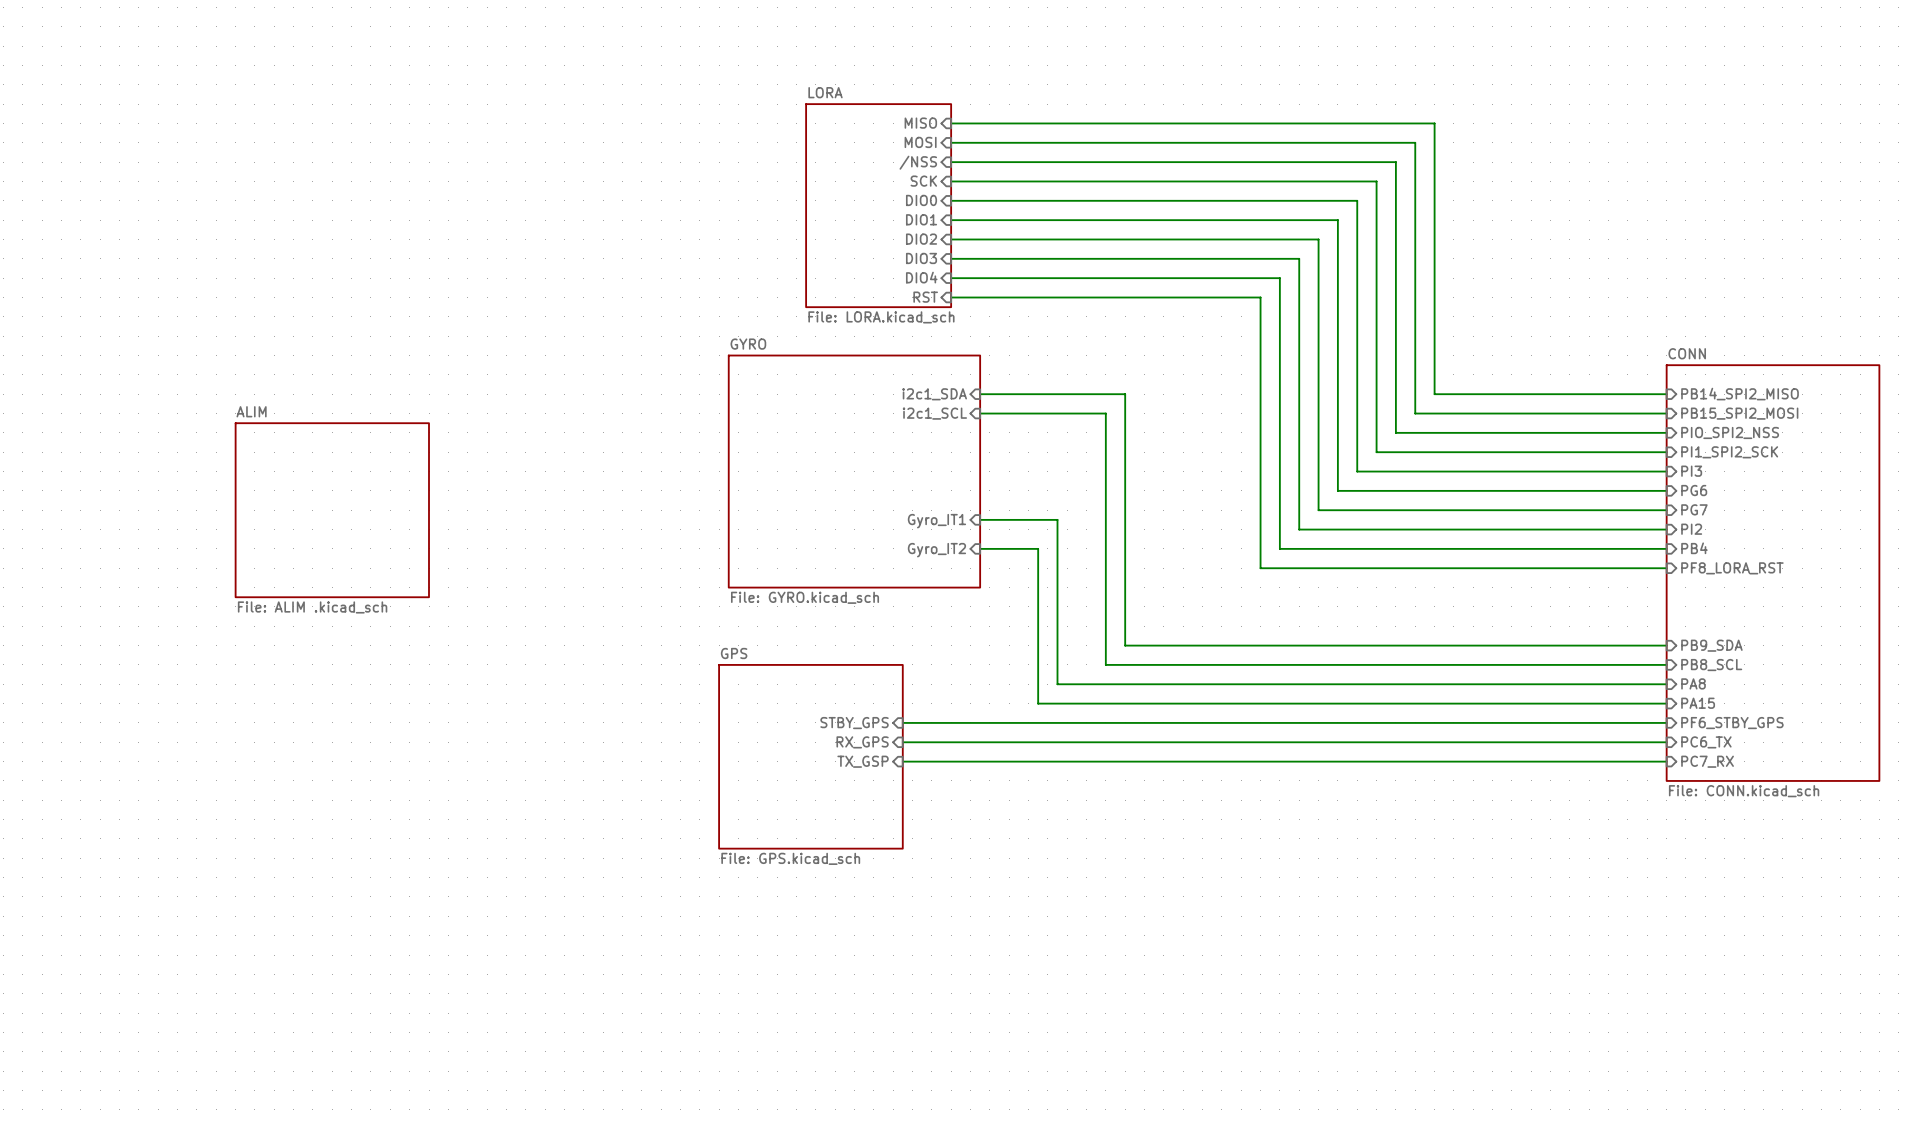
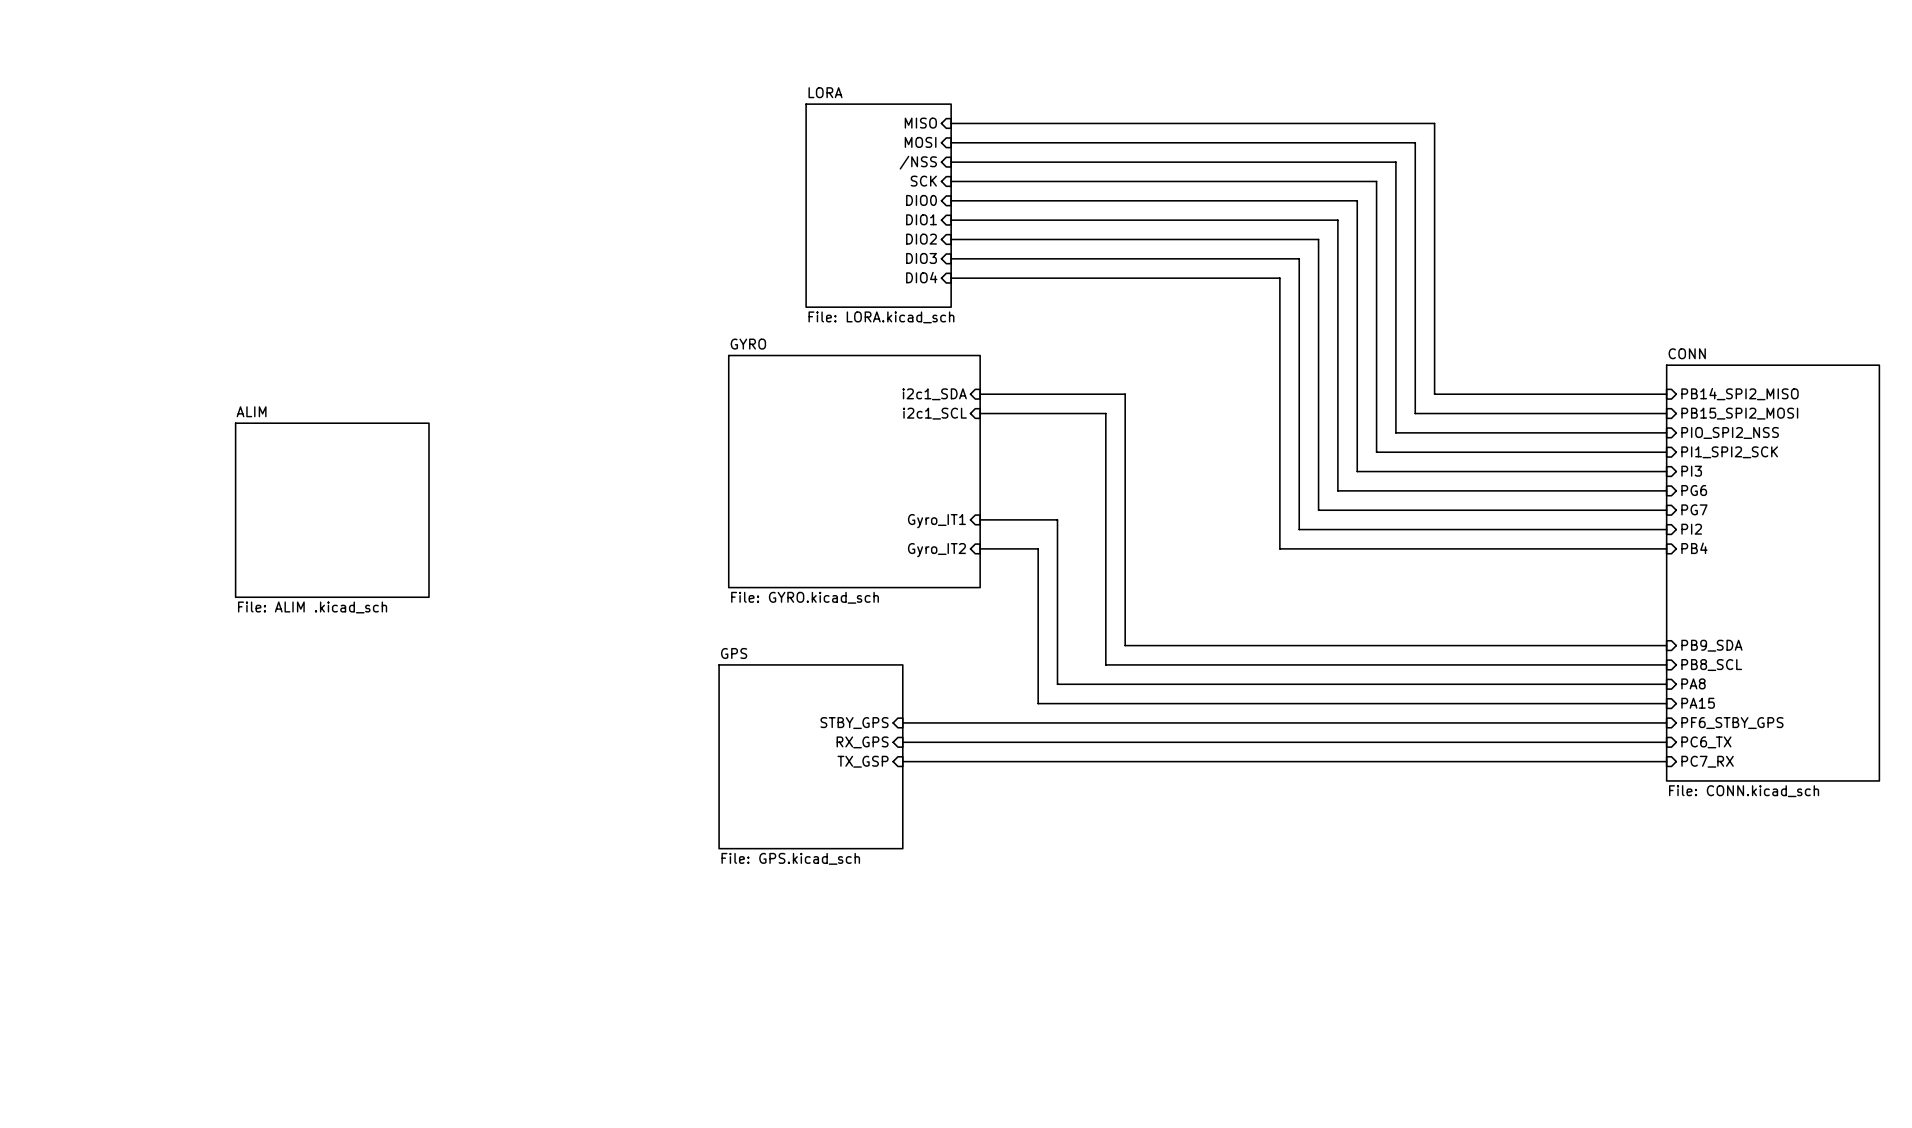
sheet pin: RST (925, 297) -> none
wire: (951, 297) (1260, 297) (1260, 568) (1666, 568) -> none
sheet pin: PF8_LORA_RST (1732, 568) -> none

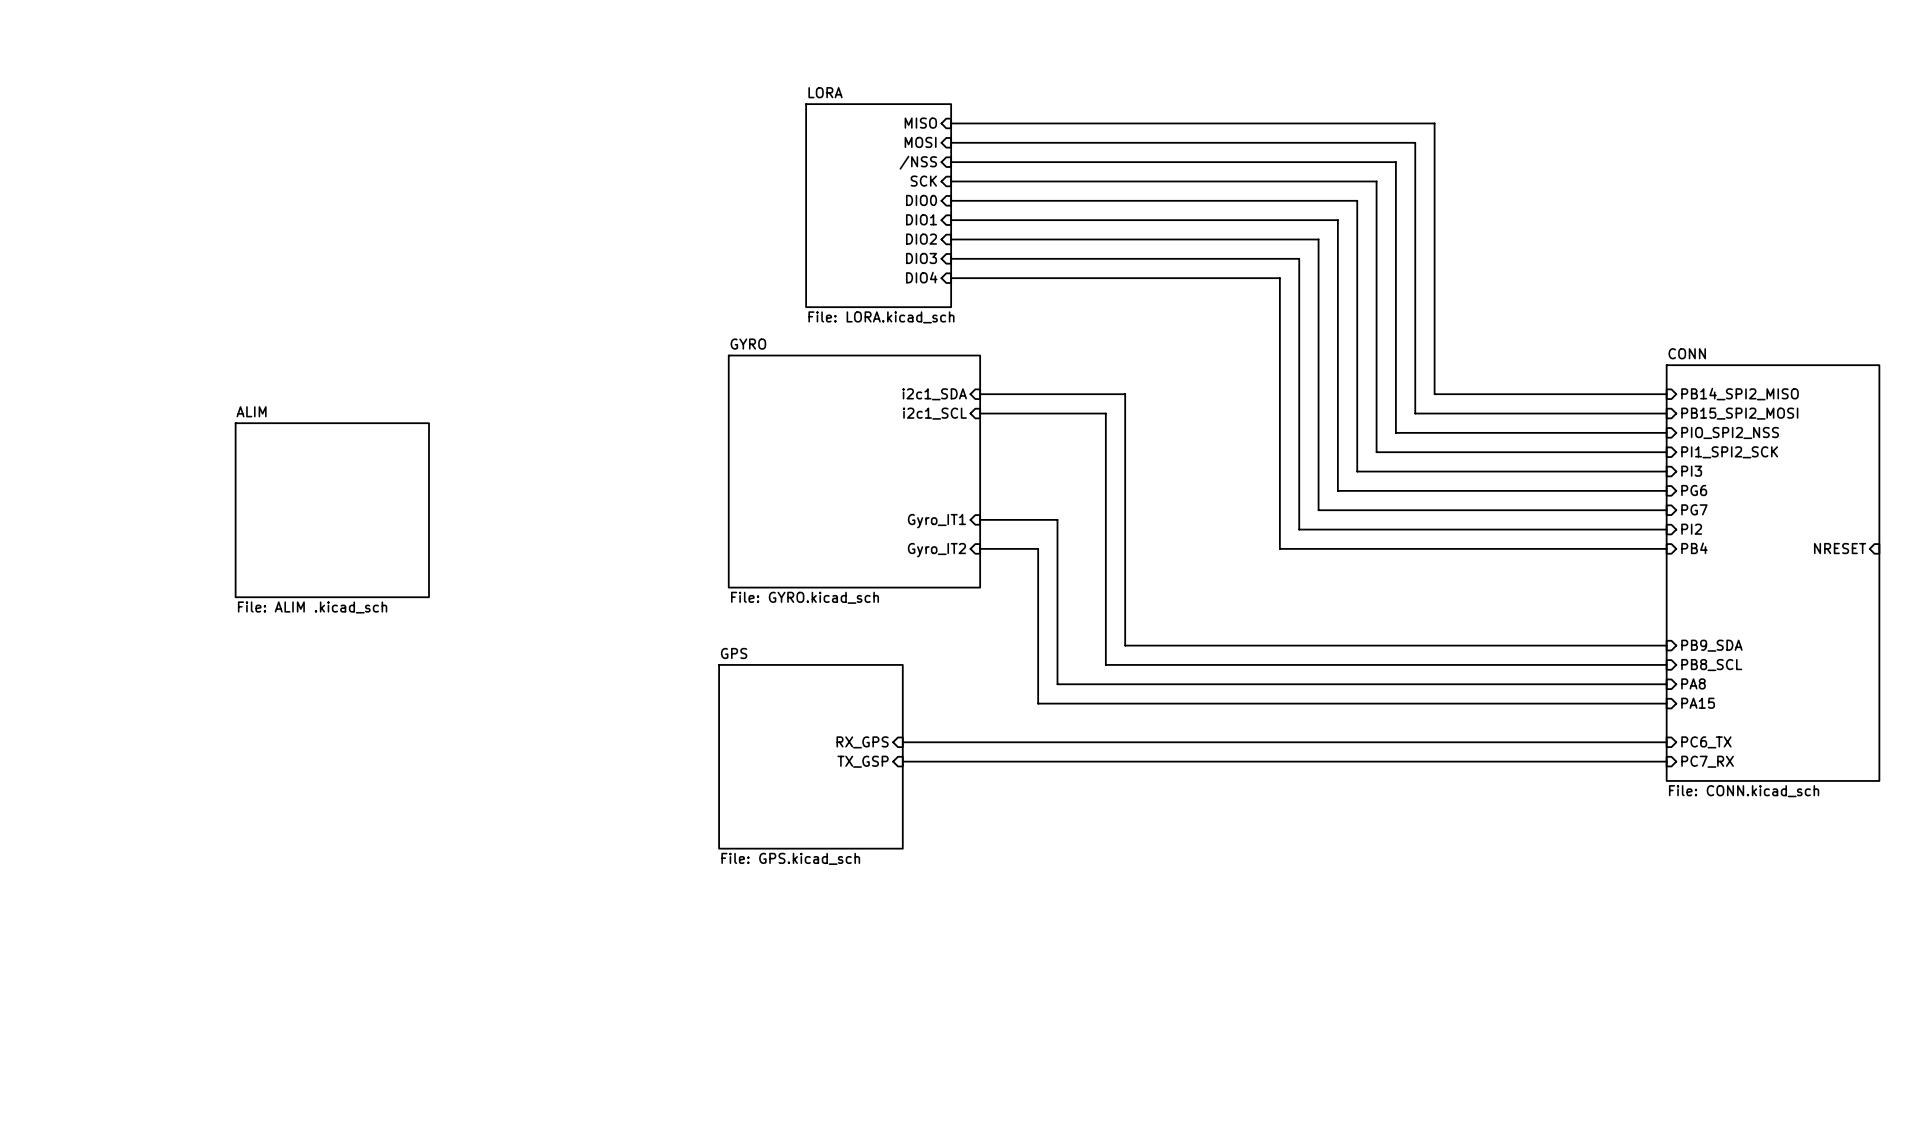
sheet pin: none -> NRESET (1840, 548)
wire: (902, 722) (1666, 722) -> none
sheet pin: STBY_GPS (854, 723) -> none
sheet pin: PF6_STBY_GPS (1732, 723) -> none

